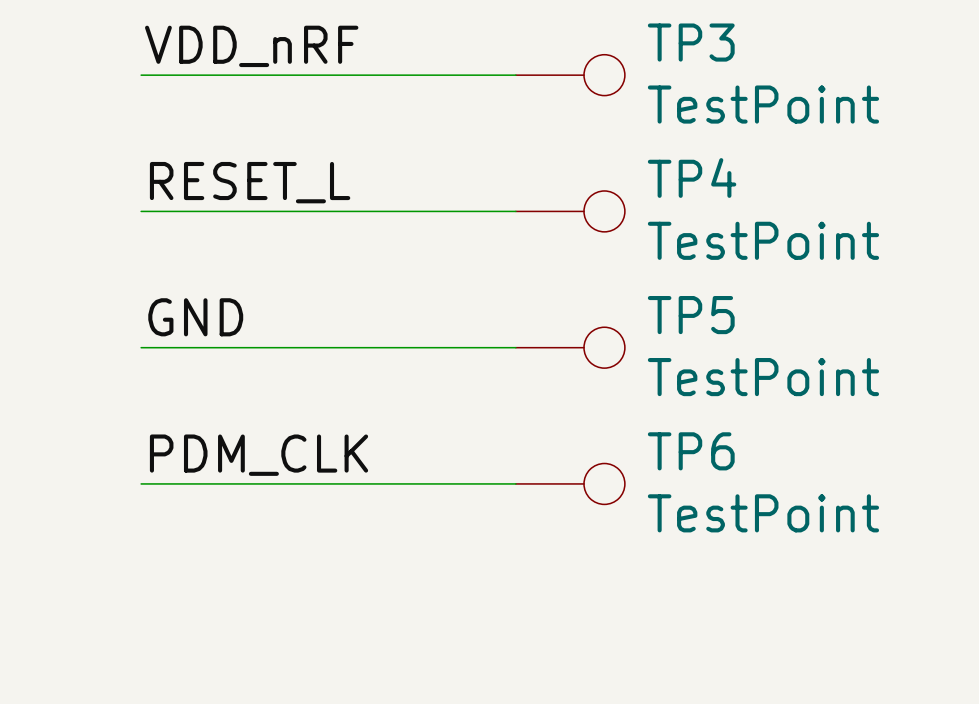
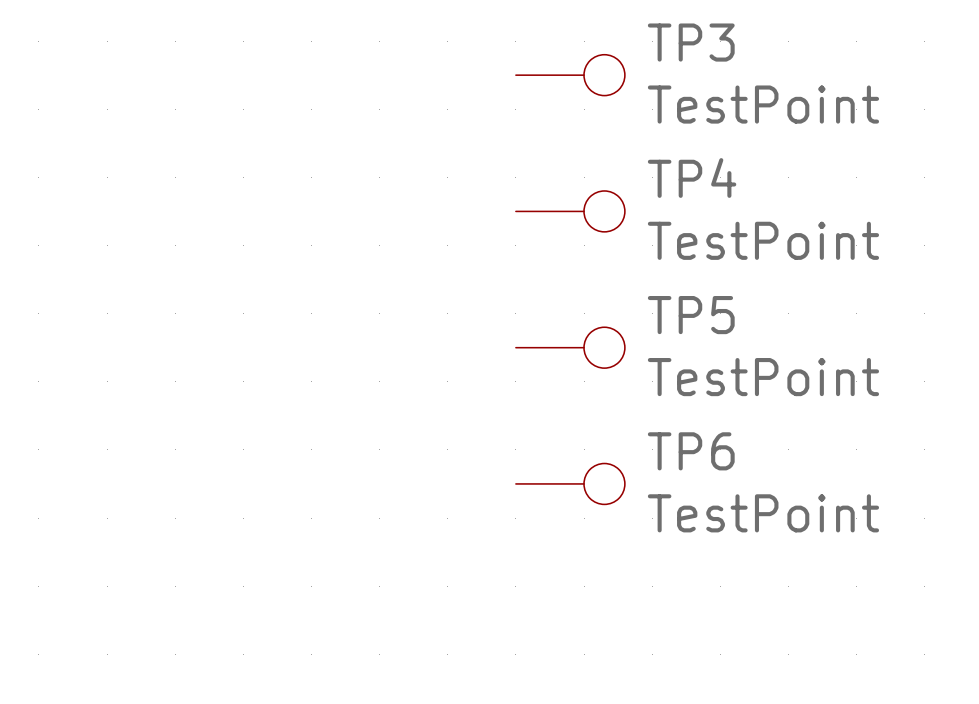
label: VDD_nRF (251, 46) -> none
wire: (141, 75) (515, 75) -> none
label: RESET_L (250, 182) -> none
wire: (141, 211) (515, 211) -> none
label: GND (195, 317) -> none
wire: (141, 347) (515, 347) -> none
label: PDM_CLK (259, 455) -> none
wire: (141, 483) (515, 483) -> none

